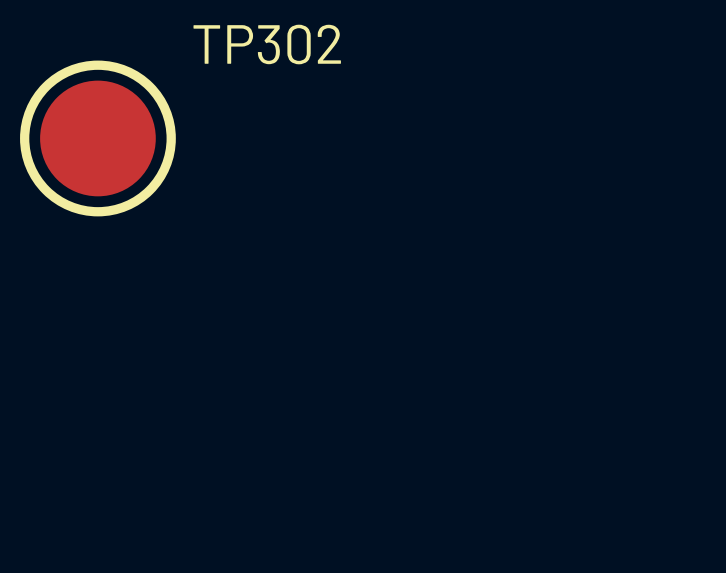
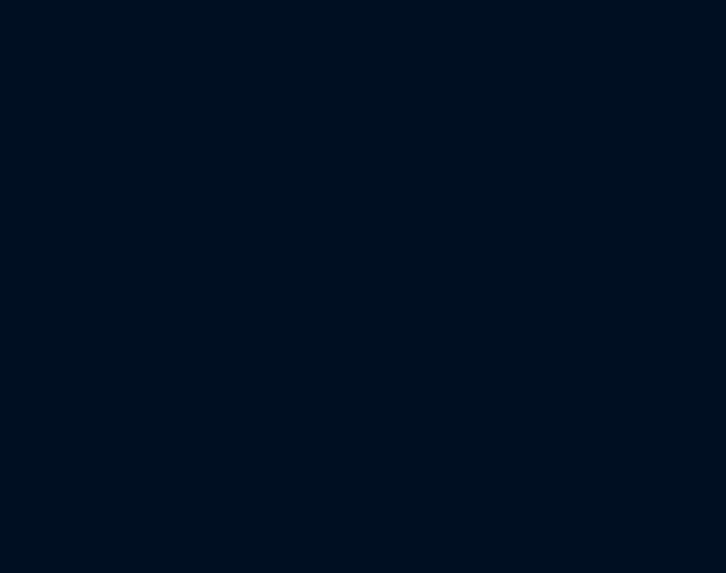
TP302: (97, 138) -> none

